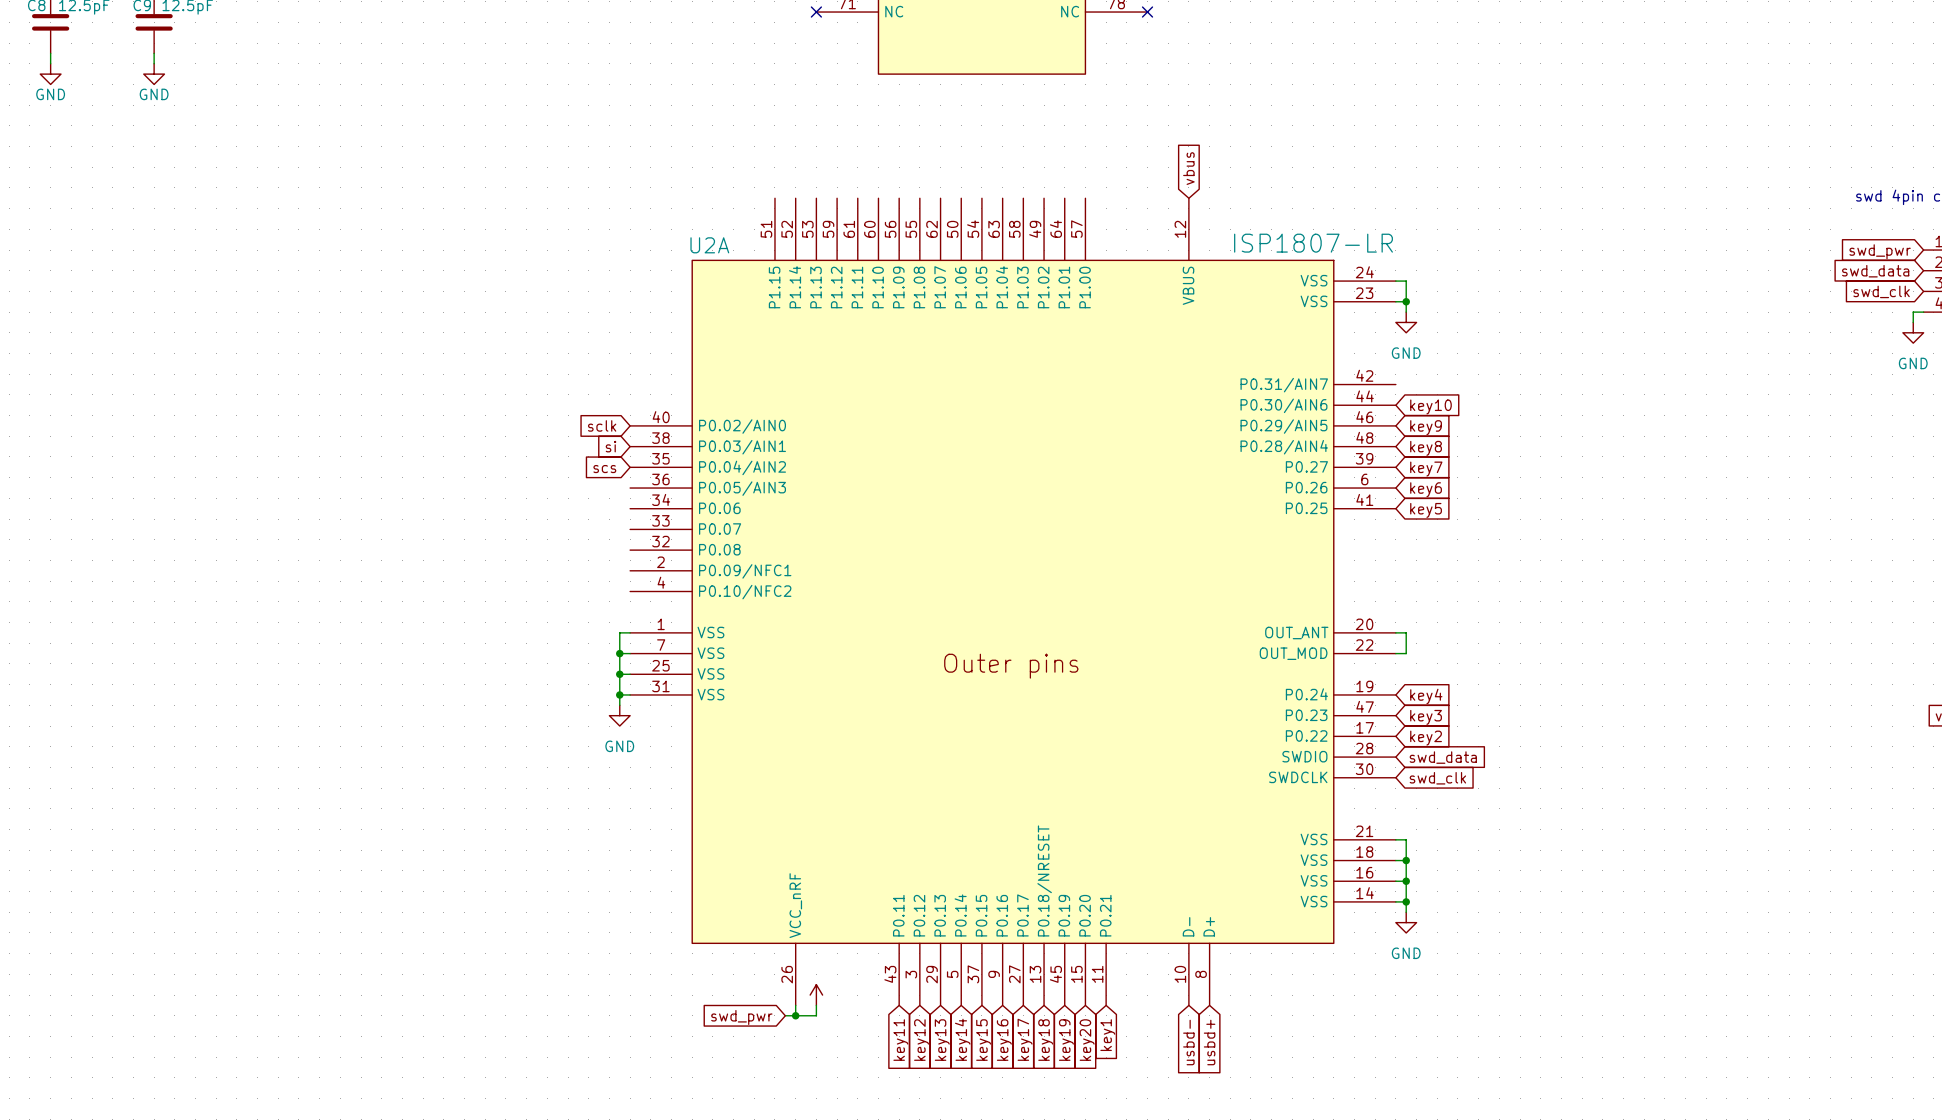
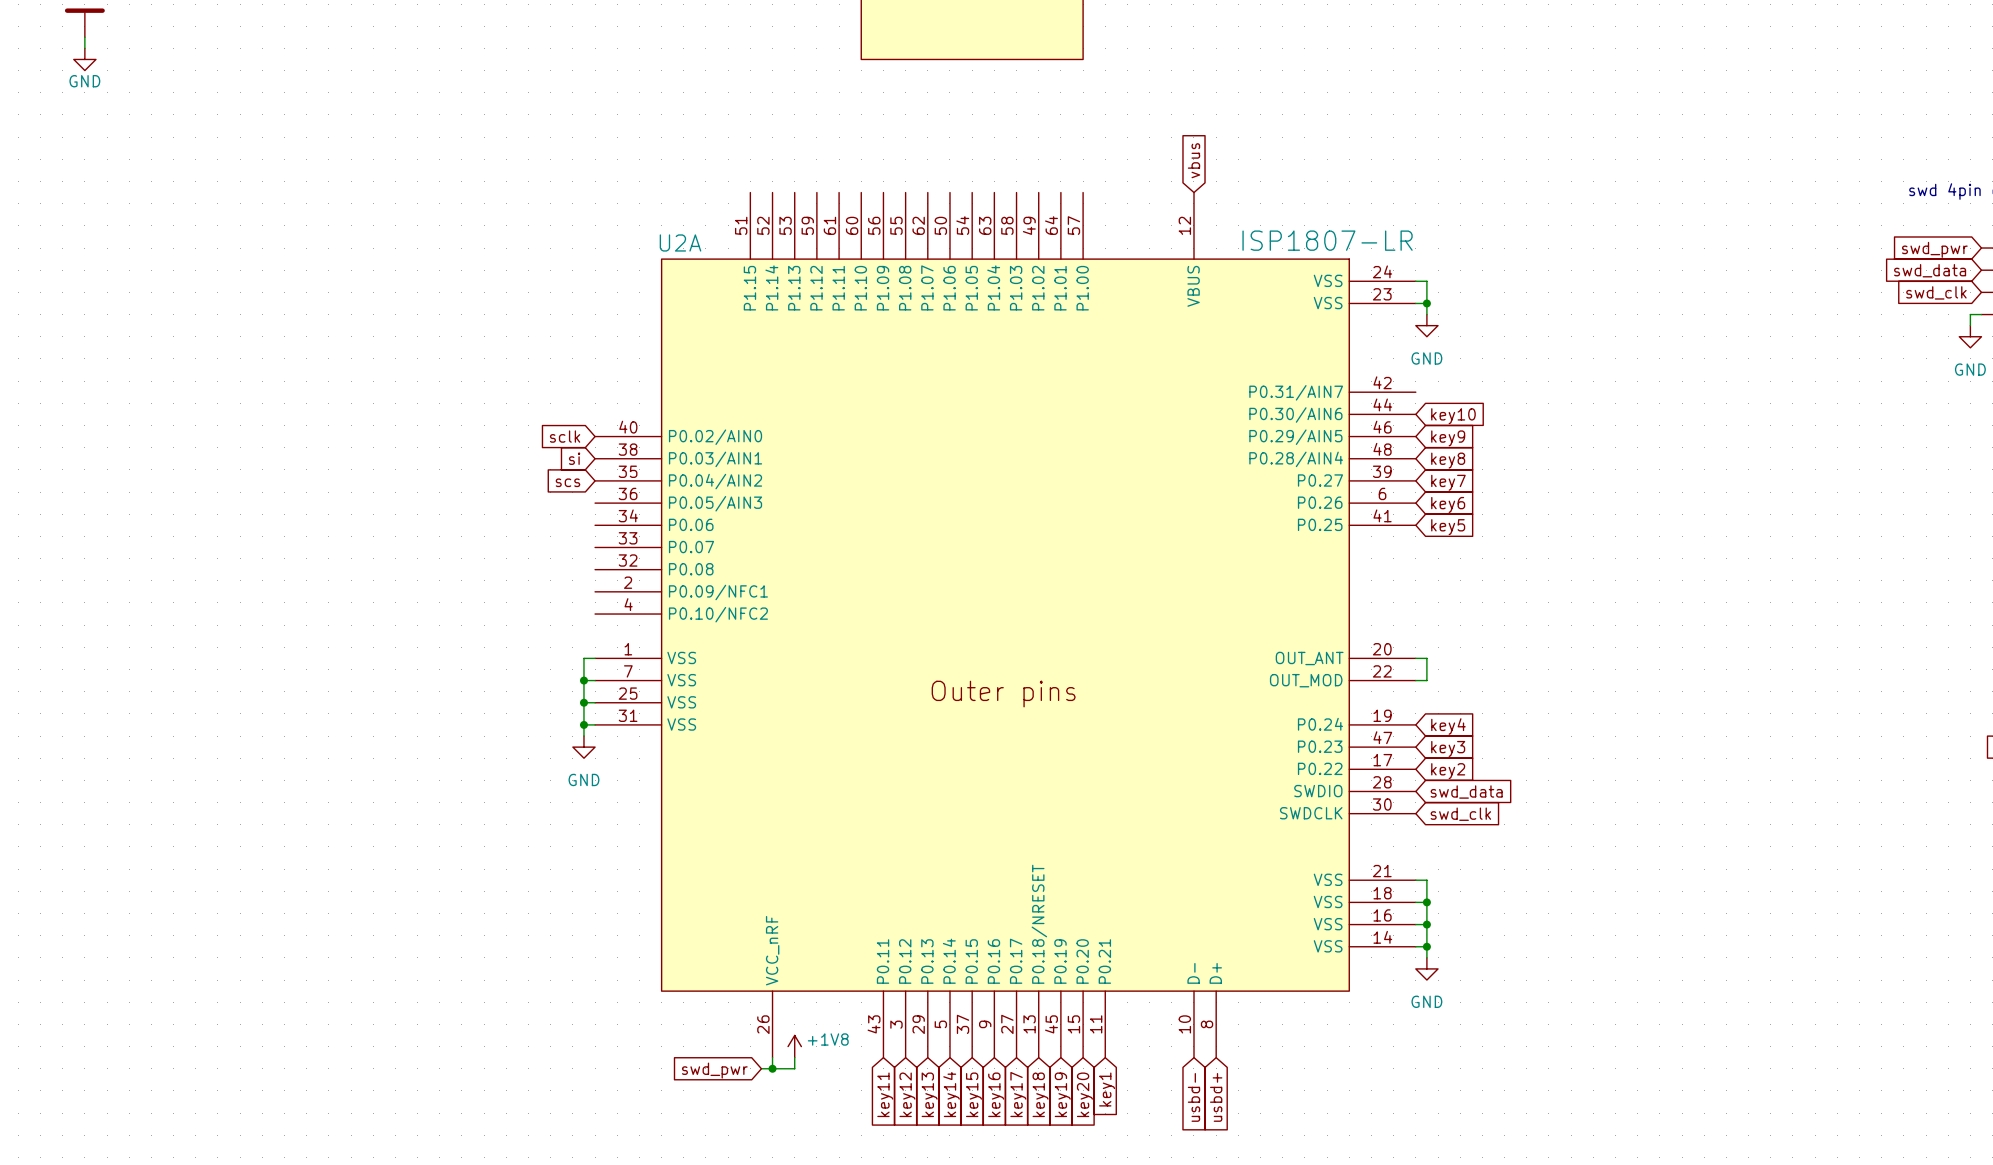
power symbol text: none -> +1V8 (828, 1039)

